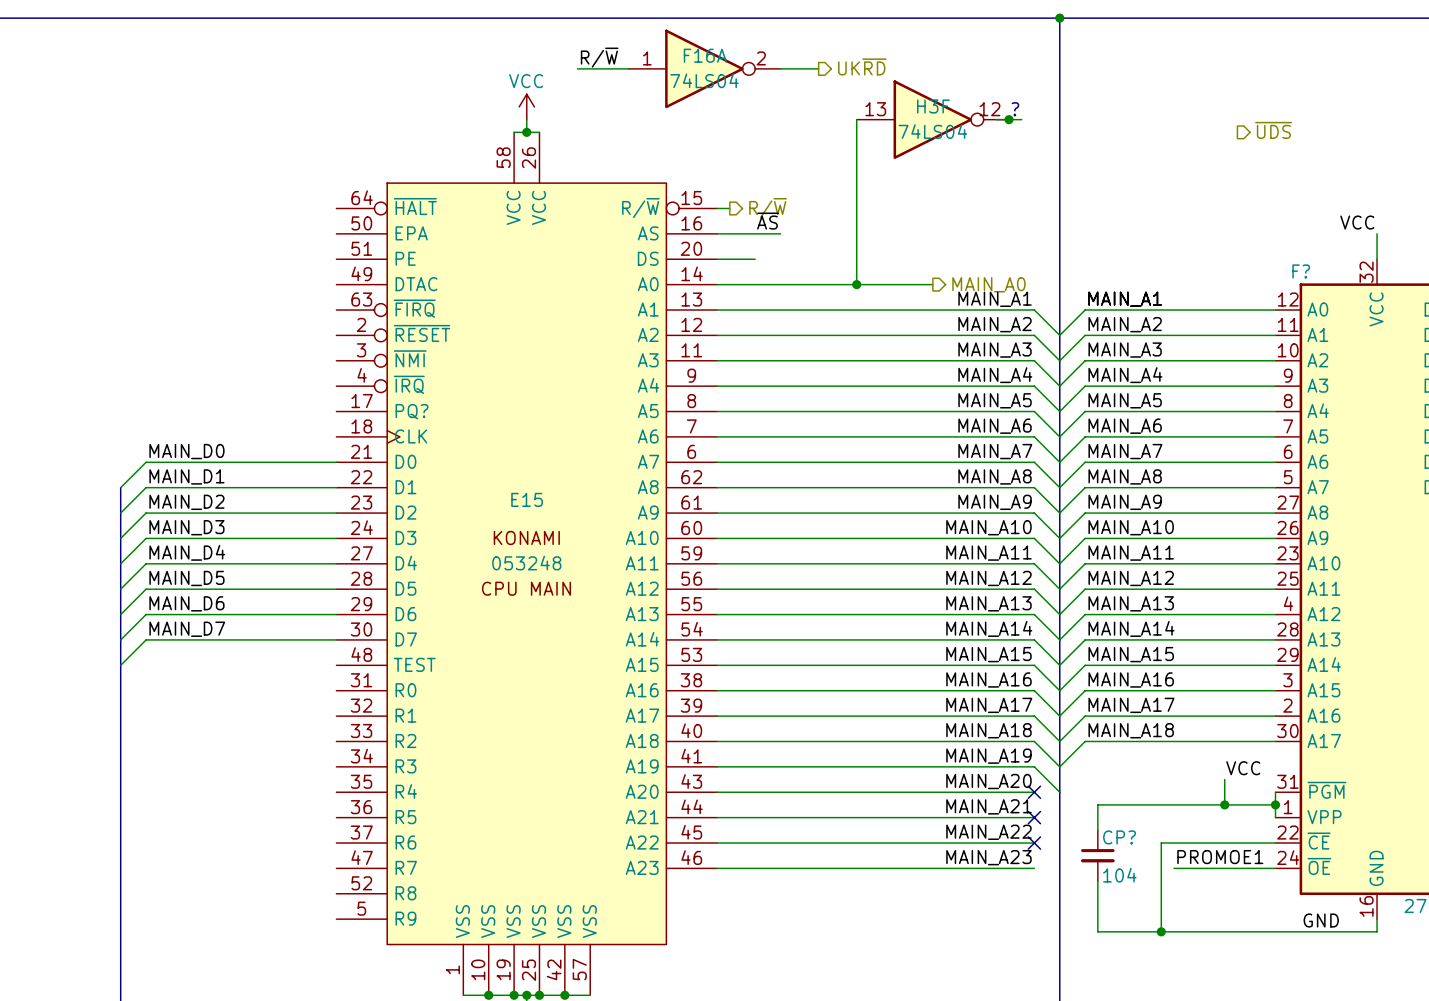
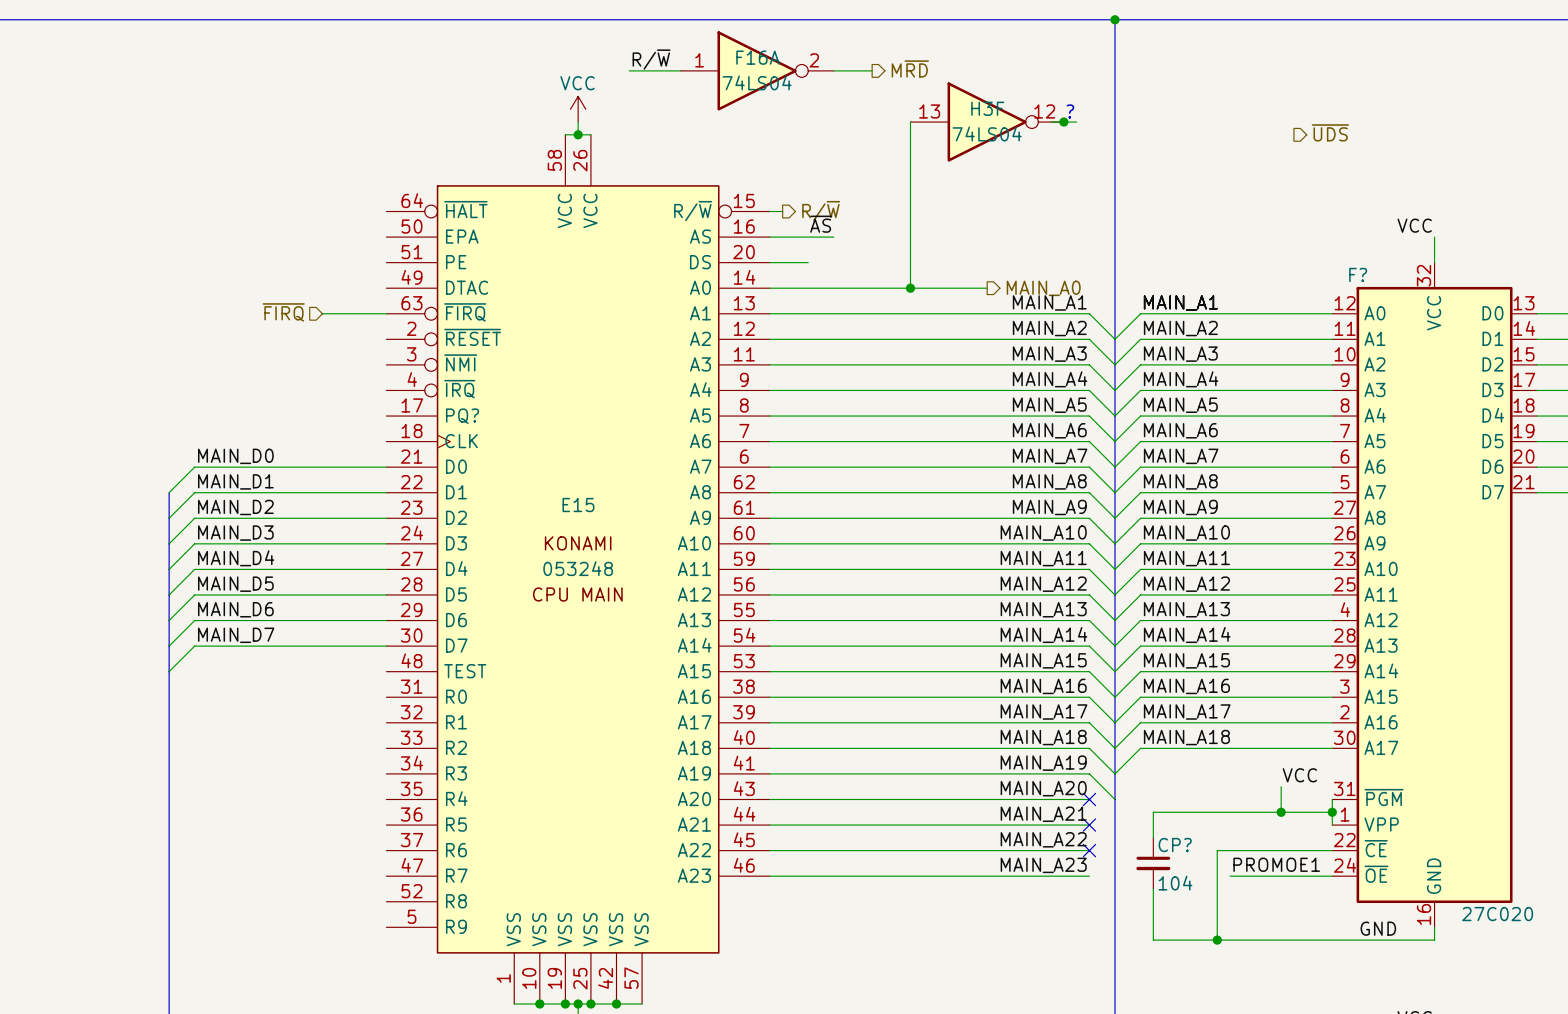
hierarchical label: UK~{RD} (862, 66) -> M~{RD} (910, 68)
hierarchical label: none -> ~{FIRQ} (283, 312)
wire: none -> (322, 313) (386, 313)

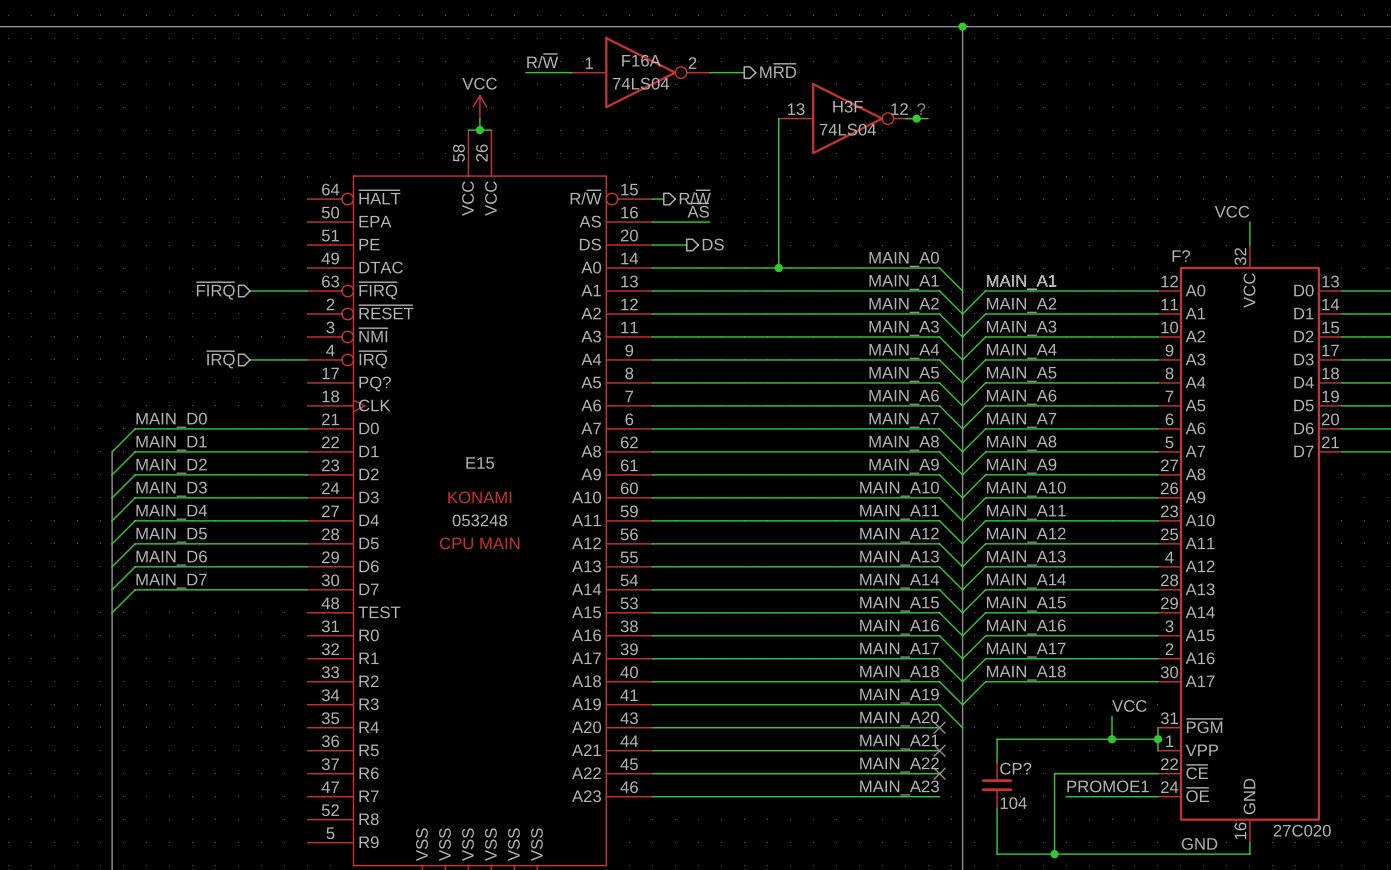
hierarchical label: ~{UDS} (1330, 132) -> none
hierarchical label: none -> DS (713, 244)
label: none -> MAIN_A0 (904, 259)
wire: none -> (847, 268) (939, 268) (962, 291)
hierarchical label: MAIN_A0 (1043, 288) -> none
hierarchical label: none -> ~{IRQ} (220, 359)
wire: none -> (250, 359) (307, 359)

